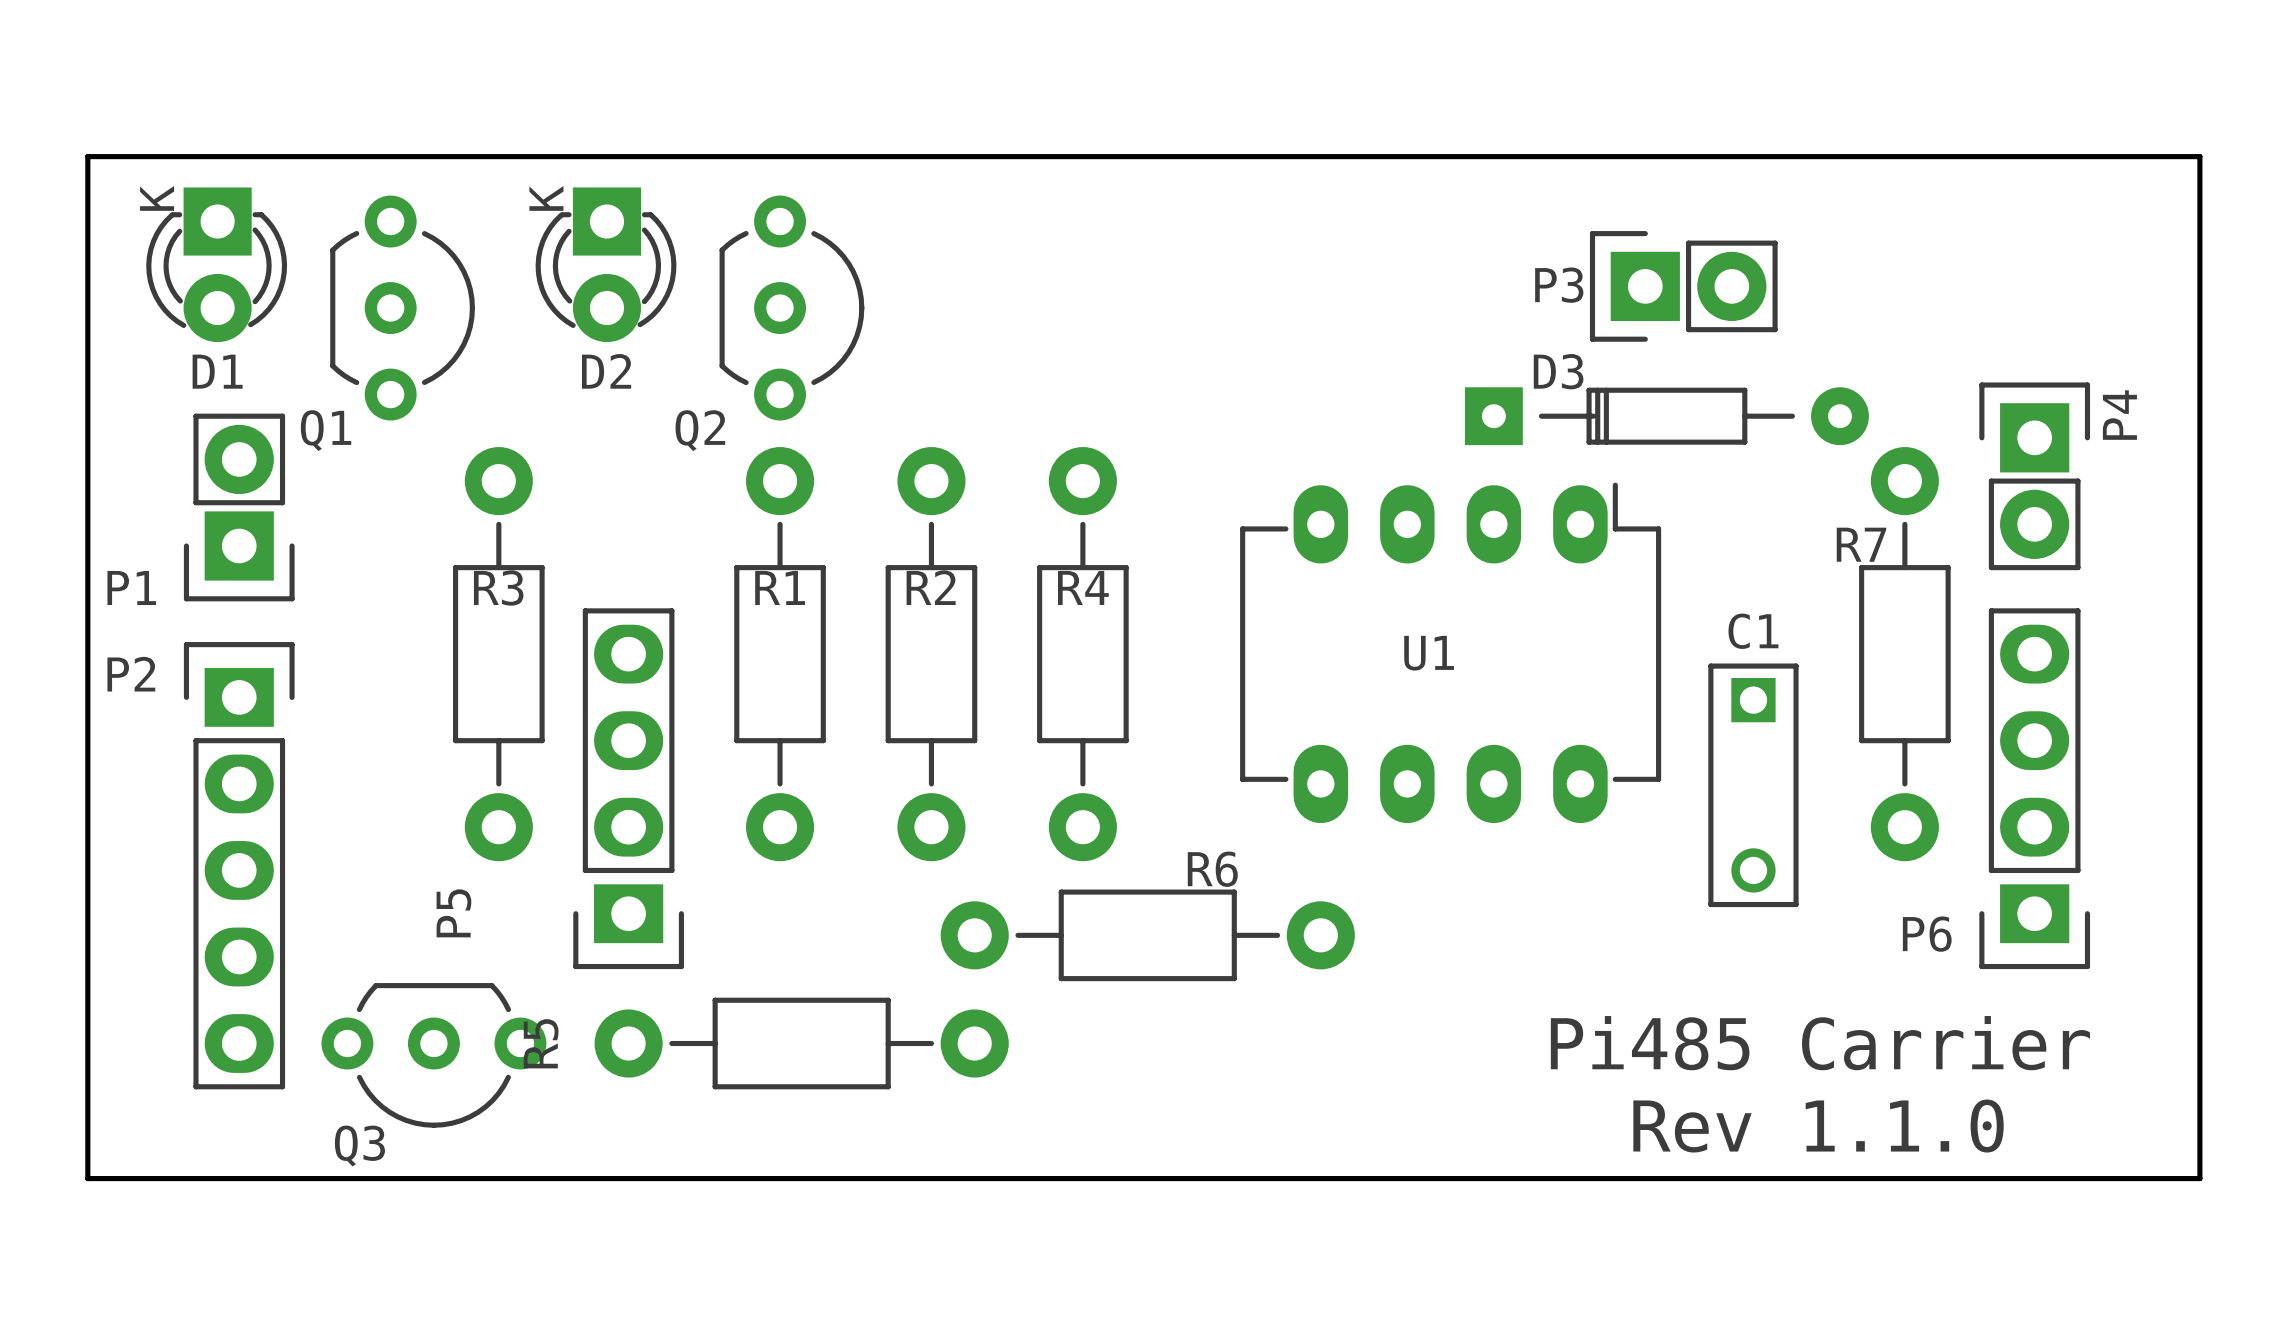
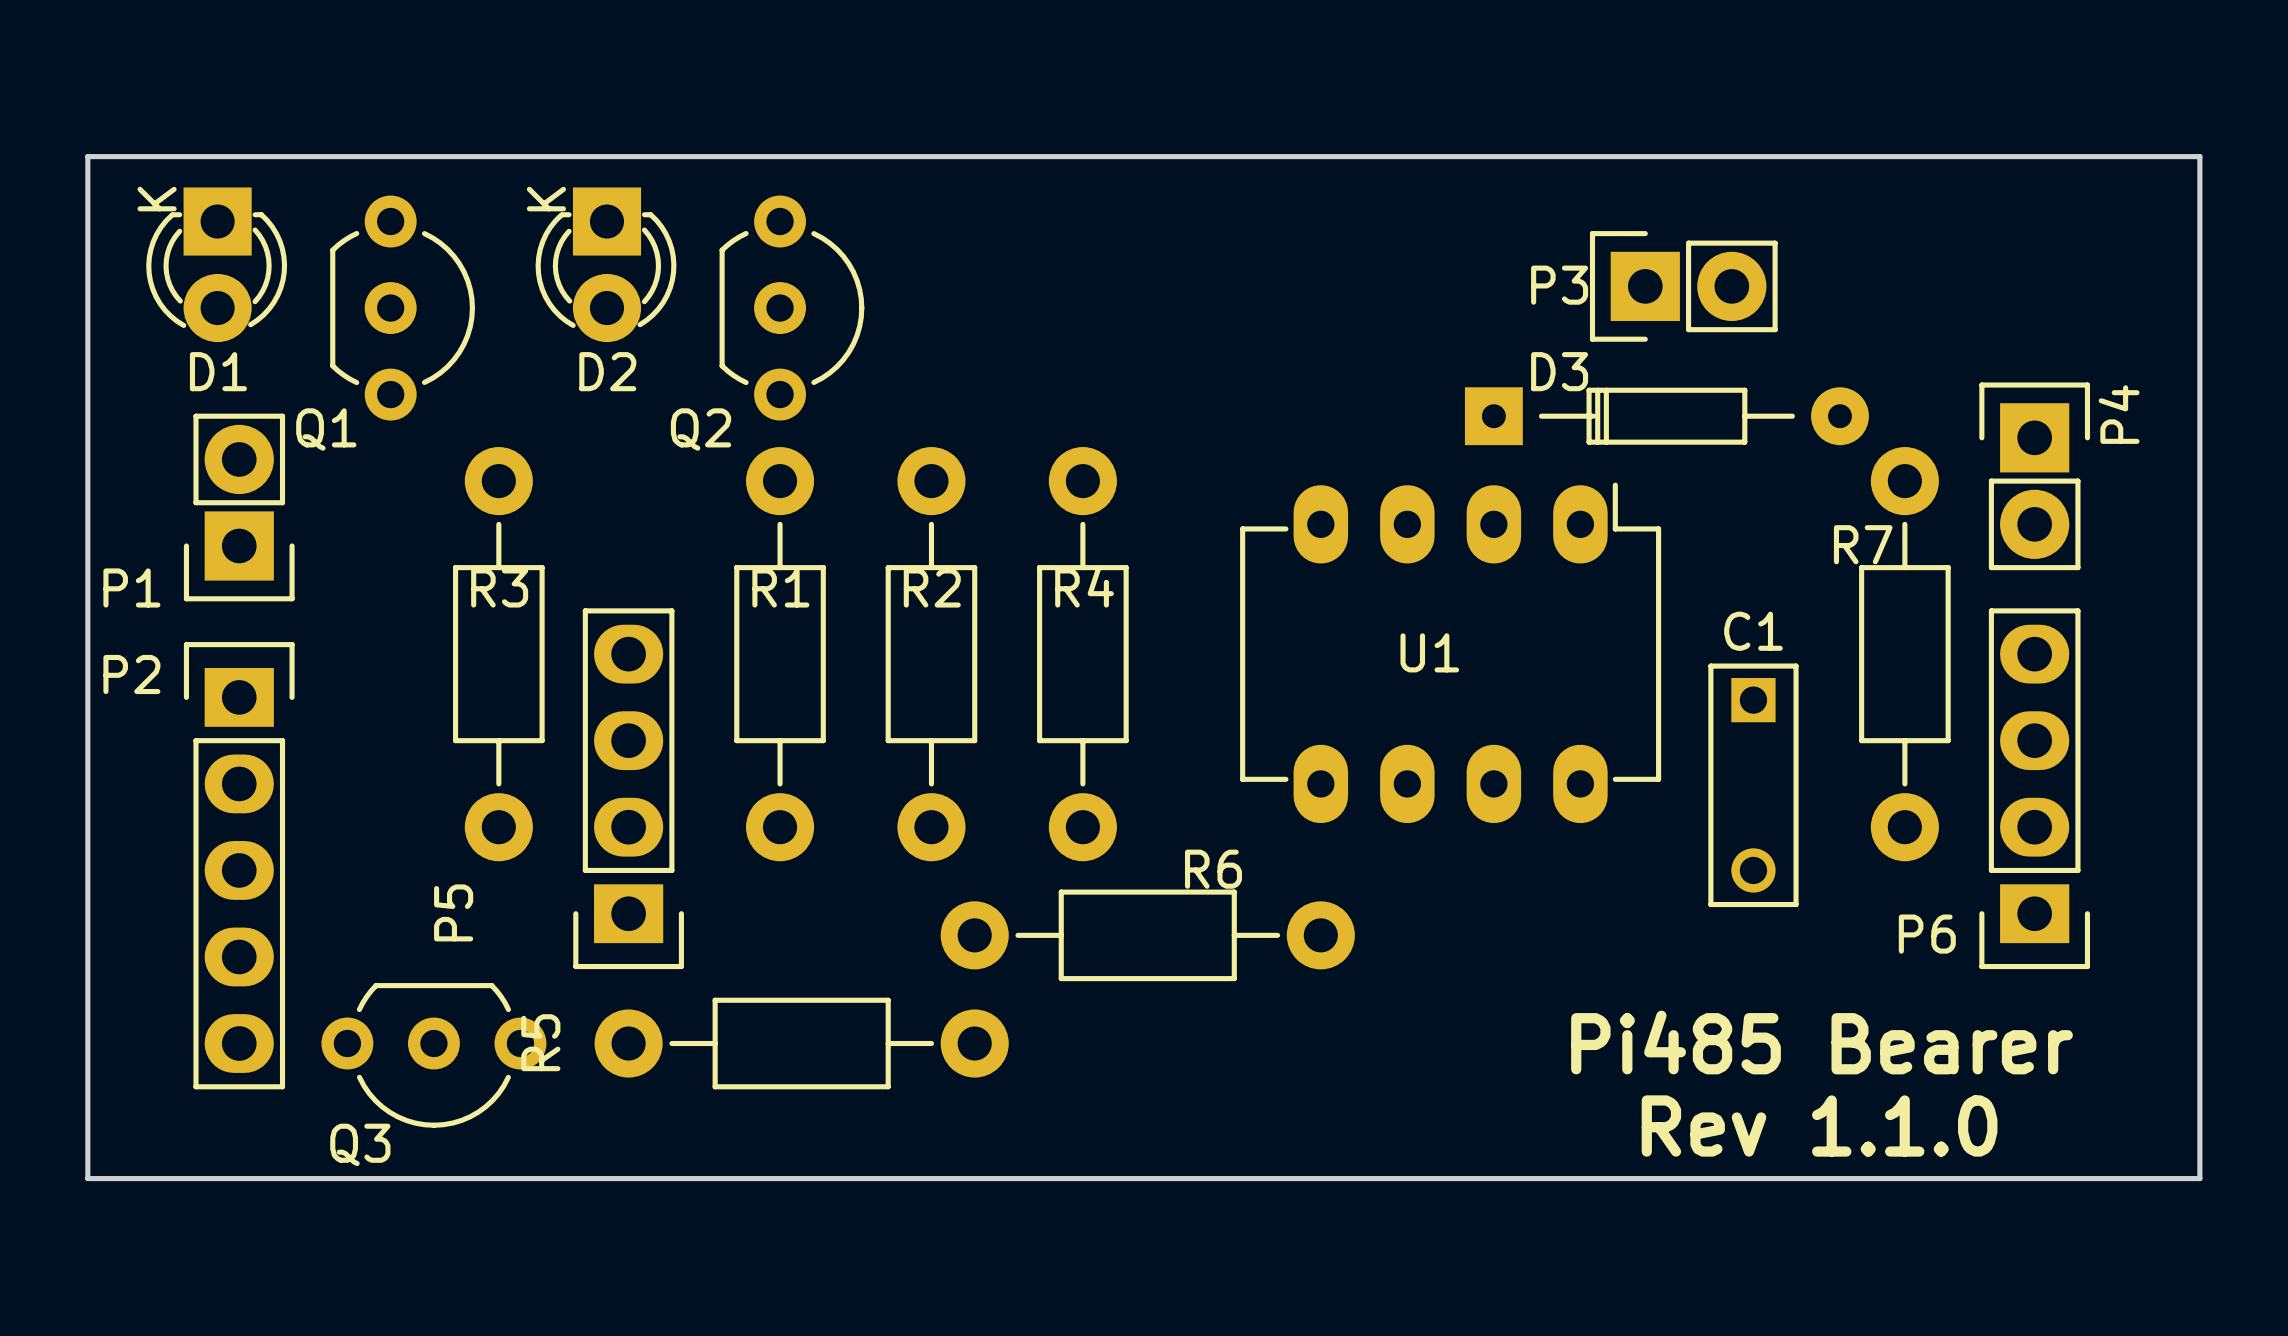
text: Pi485 Carrier (1820, 1043) -> Pi485 Bearer (1822, 1042)

